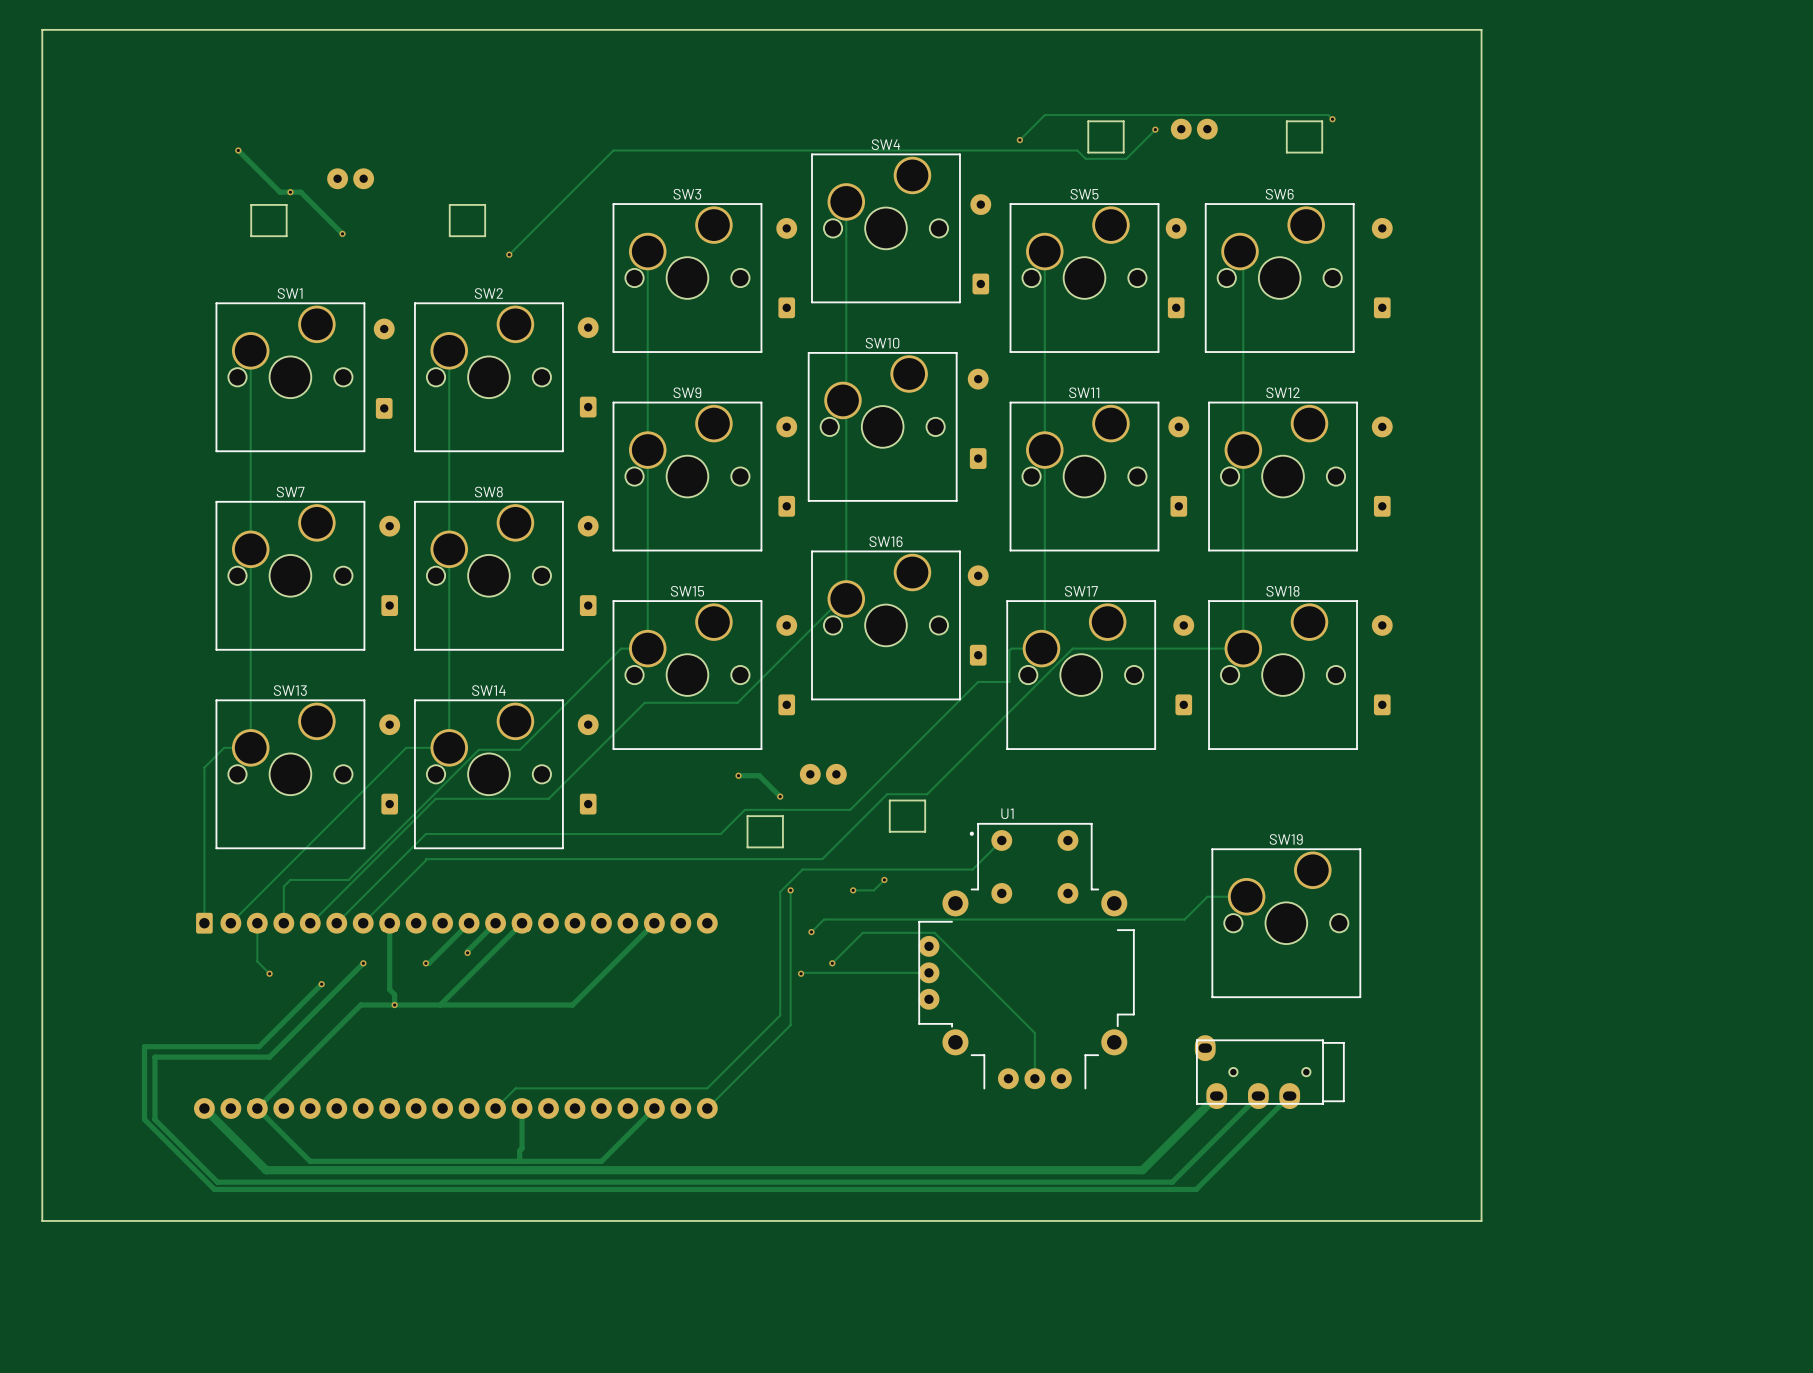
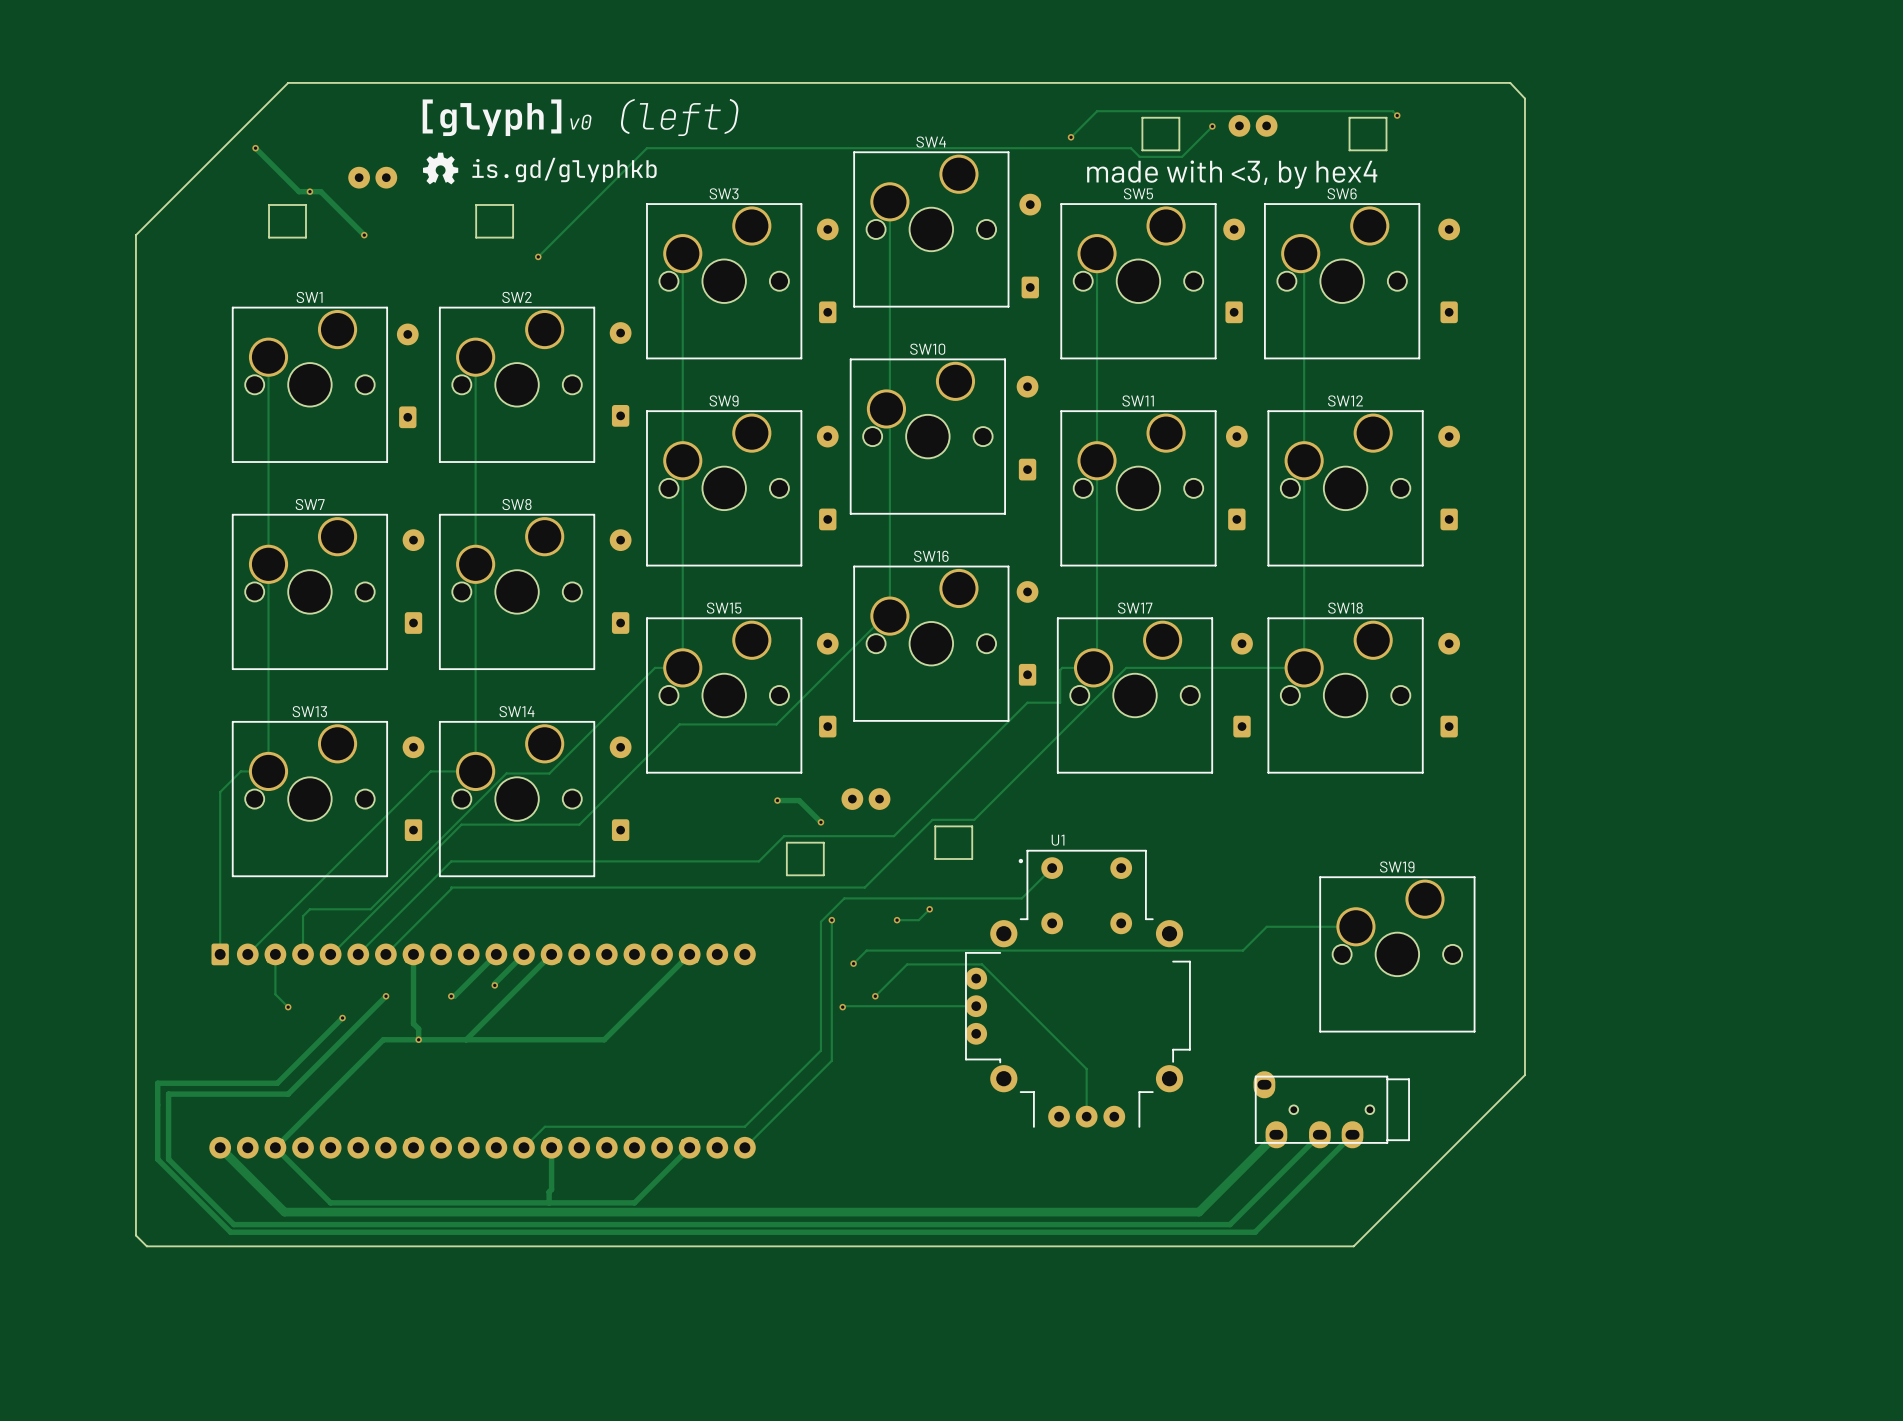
board edge: (42, 29) (1481, 29) (1481, 1220) (42, 1220) (42, 29) -> (288, 82) (135, 235) (135, 1235) (146, 1246) (1353, 1246) (1524, 1075) (1524, 98) (1510, 82) (288, 82)
drawing: none -> [422, 99, 592, 137]
drawing: none -> [620, 98, 739, 137]
drawing: none -> [422, 152, 459, 185]
drawing: none -> [472, 157, 657, 183]
text: none -> made with <3, by hex4 (1232, 174)
track: none -> (1307, 926) (1355, 926)
SW19 position: (1286, 923) -> (1397, 954)

